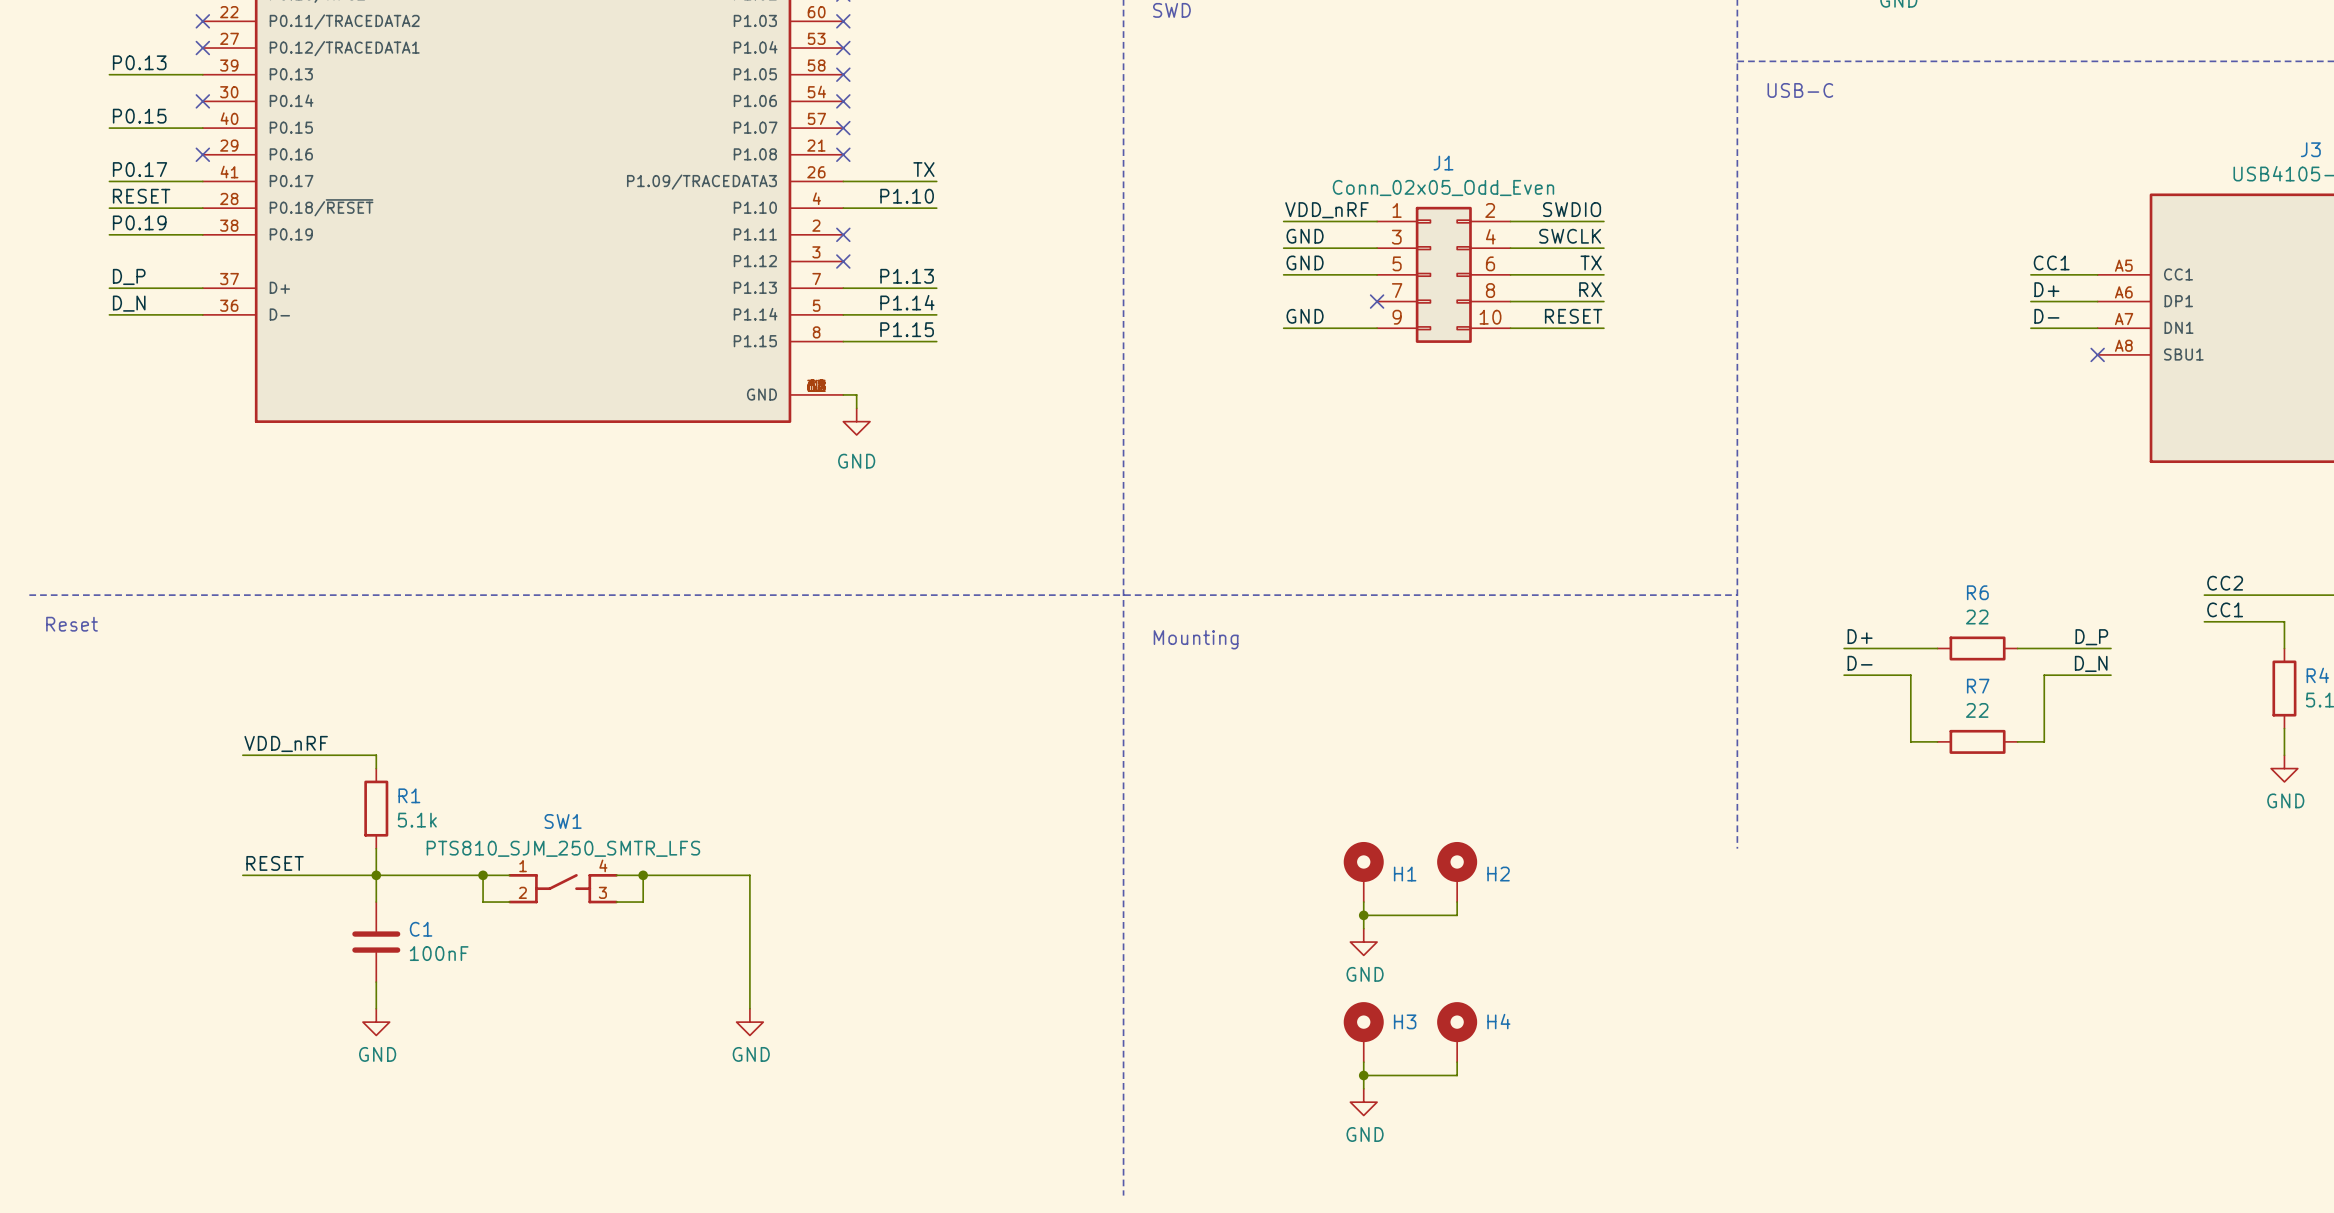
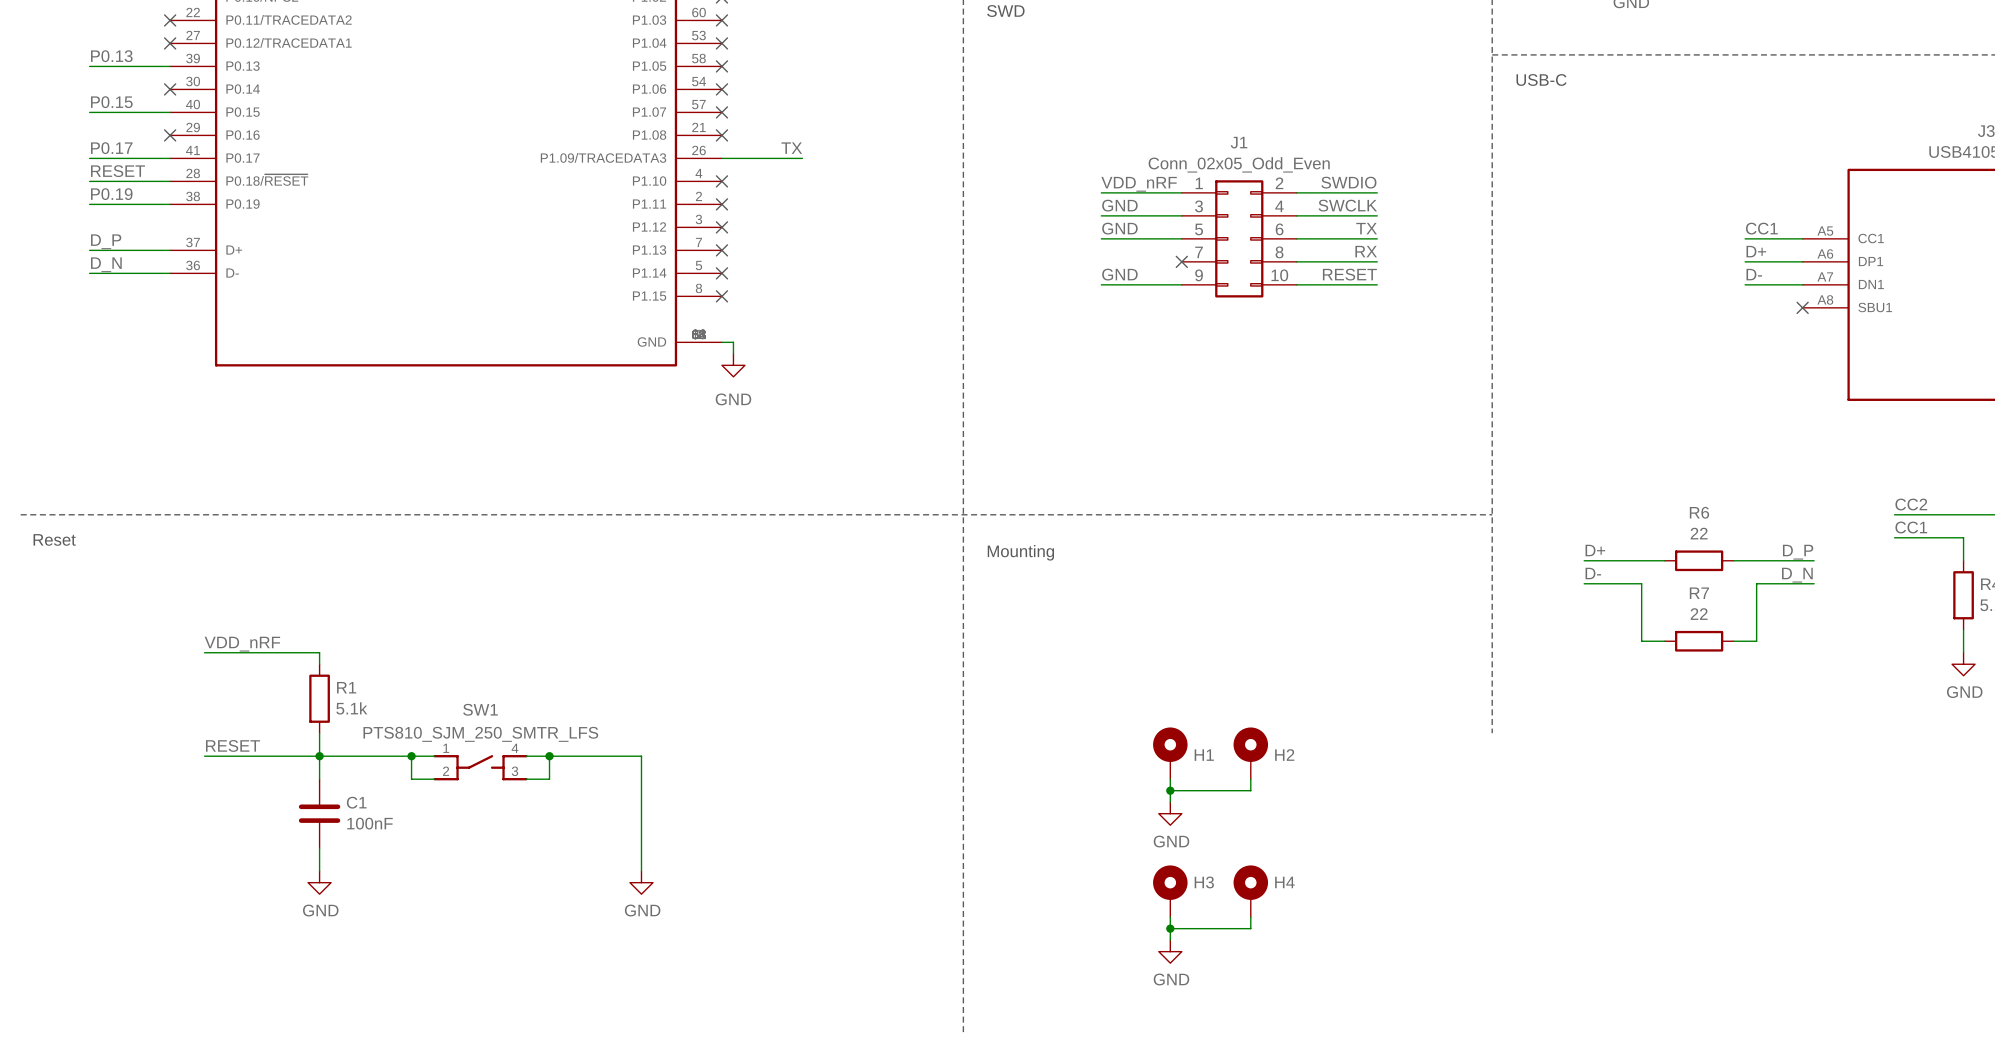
label: P1.10 (907, 196) -> none
wire: (843, 208) (936, 208) -> none
no-connect mark: none -> (721, 181)
label: P1.13 (907, 276) -> none
wire: (843, 288) (936, 288) -> none
no-connect mark: none -> (721, 250)
label: P1.14 (907, 302) -> none
wire: (843, 314) (936, 314) -> none
no-connect mark: none -> (721, 273)
label: P1.15 (907, 329) -> none
wire: (843, 341) (936, 341) -> none
no-connect mark: none -> (721, 296)

